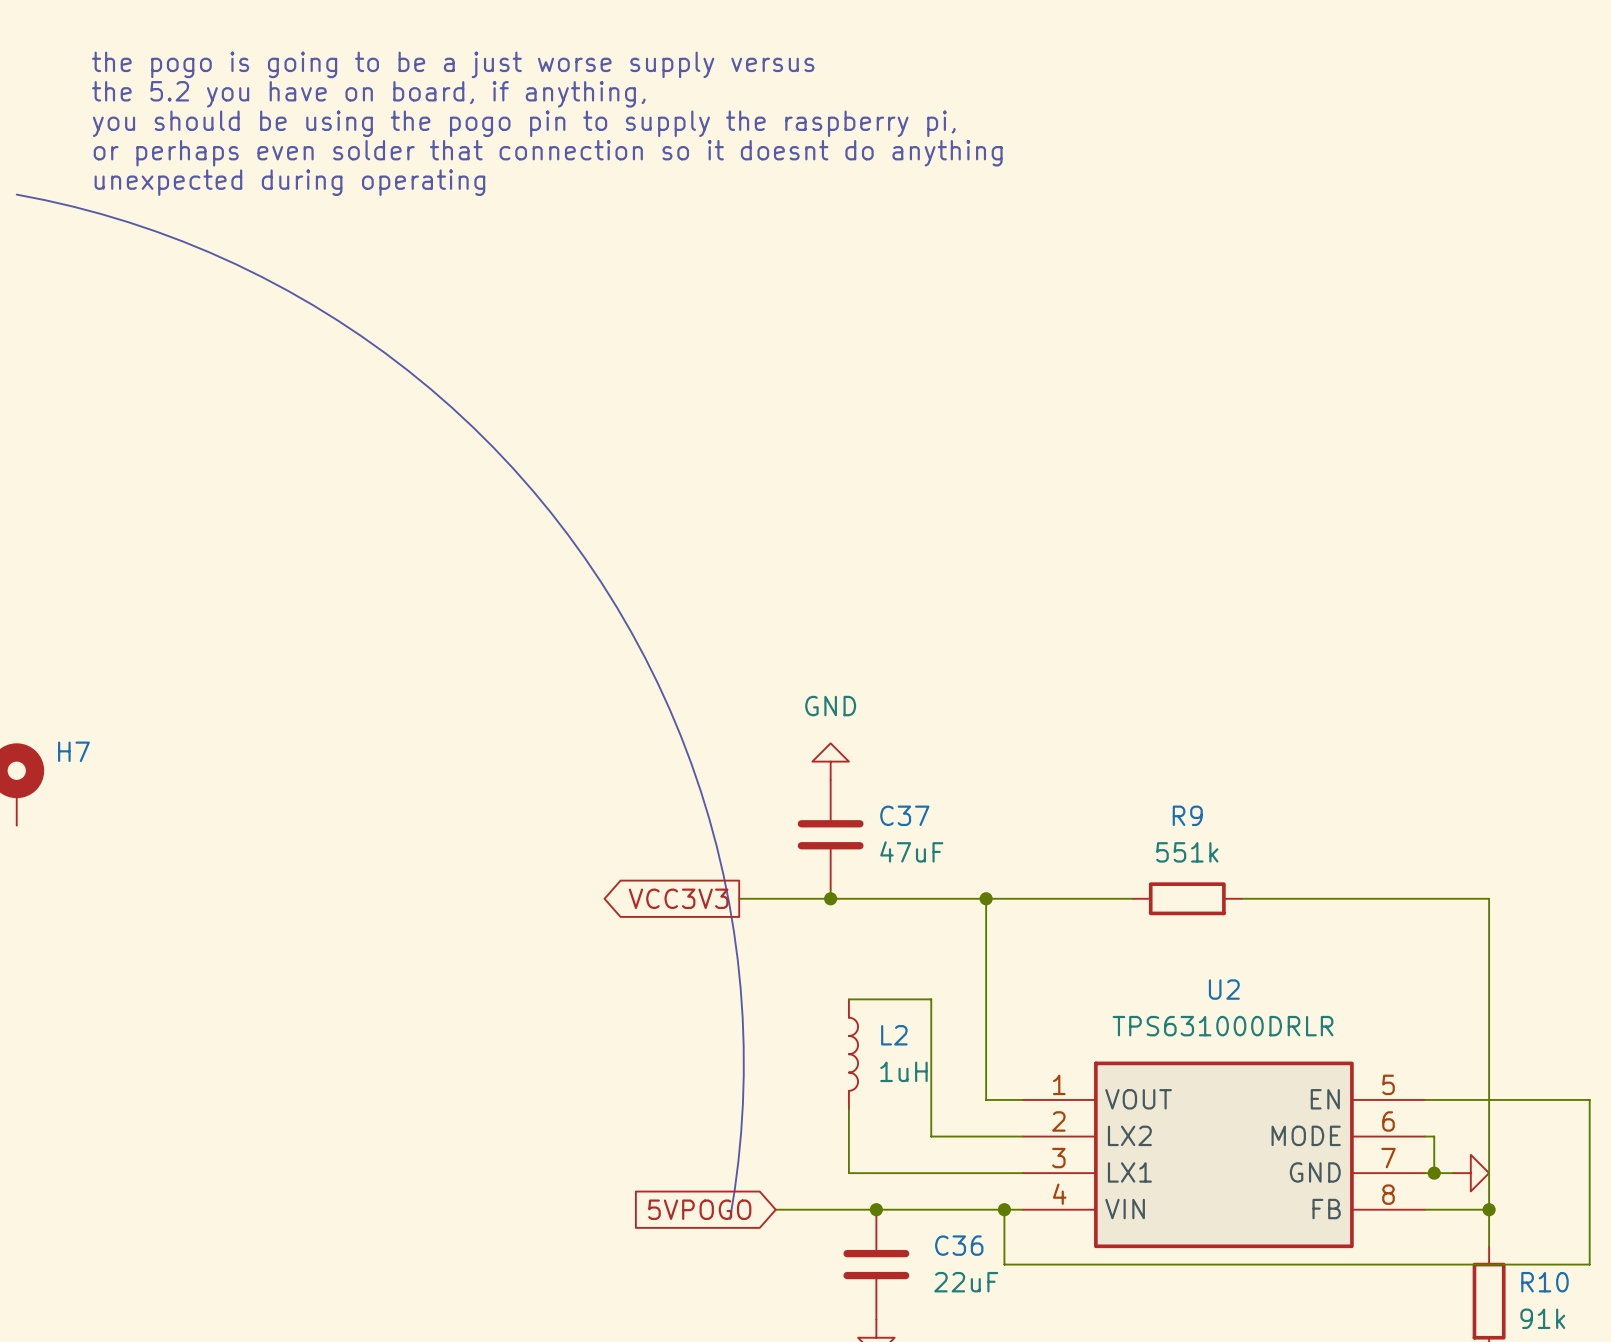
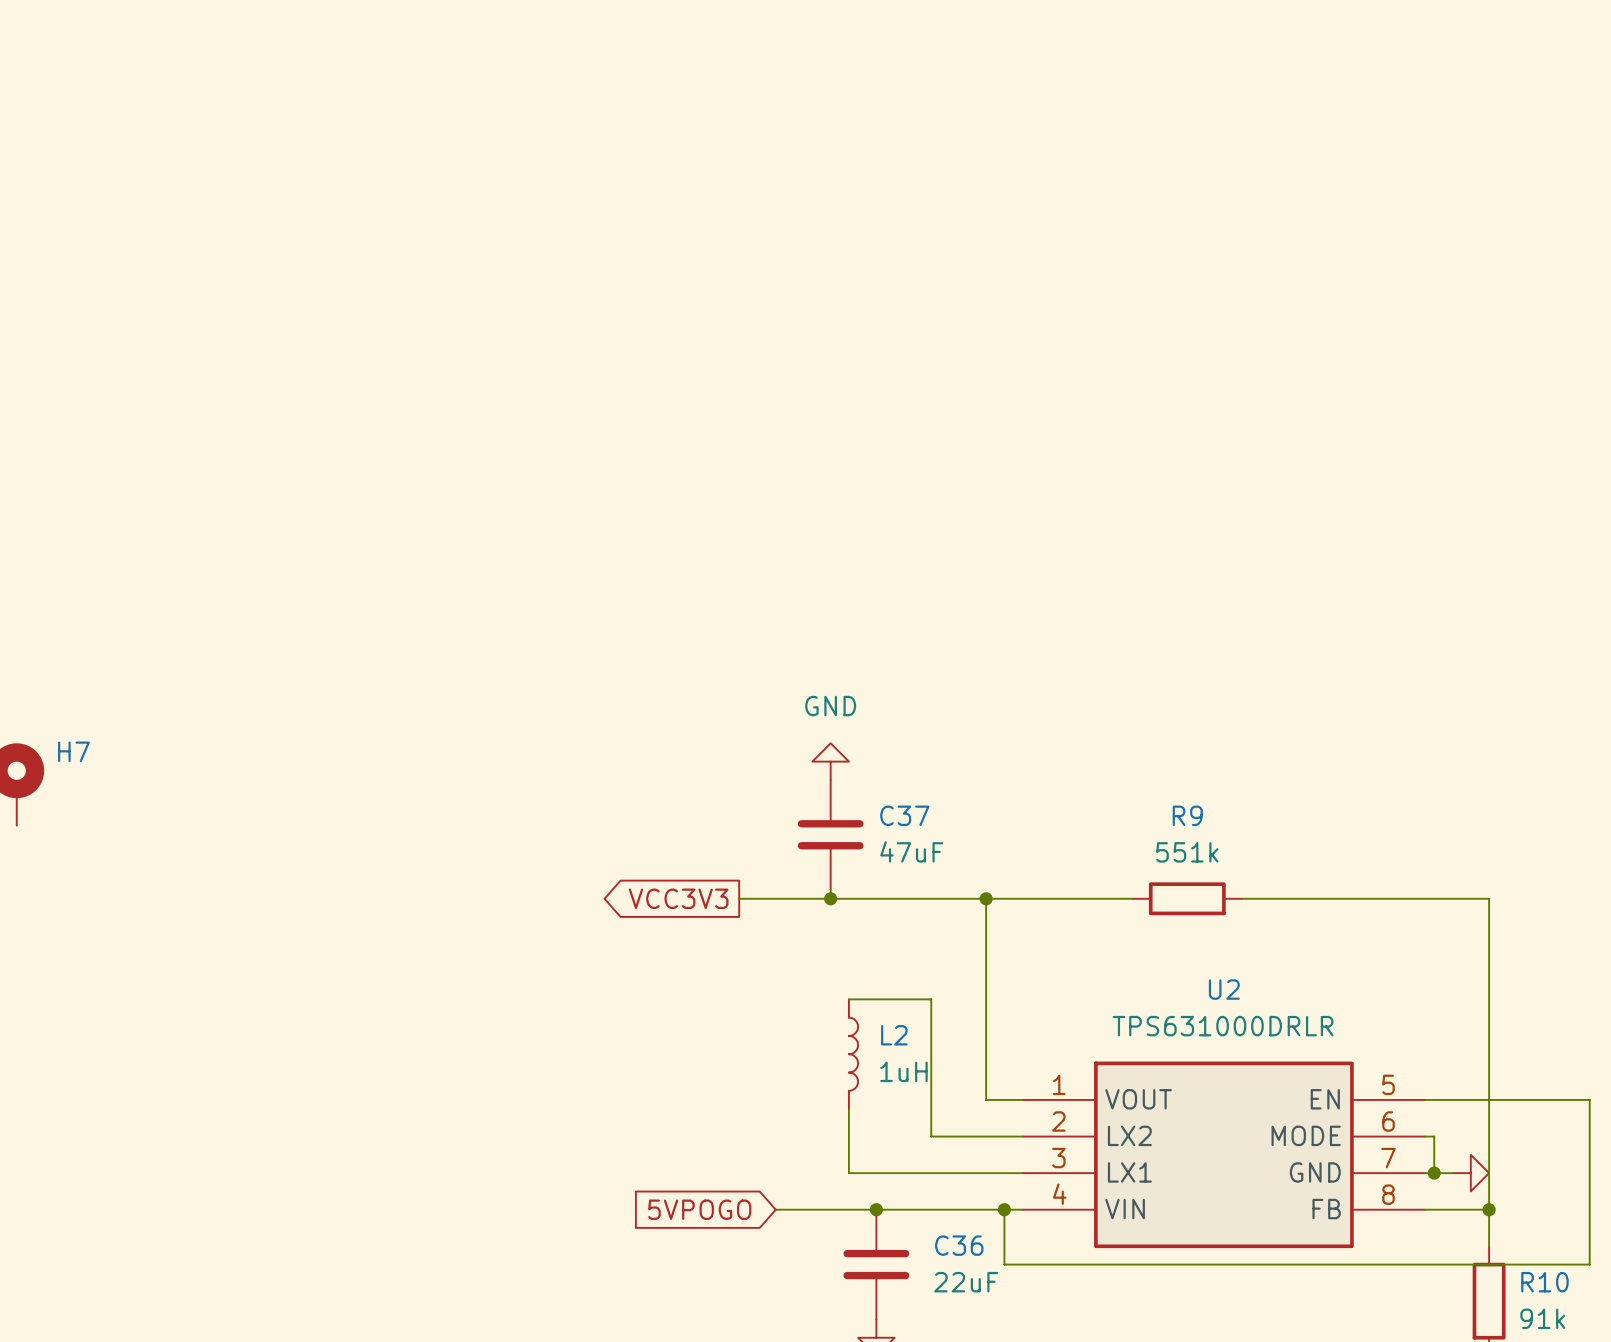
text: the pogo is going to be a just worse supply versus (453, 64) -> none
text: the 5.2 you have on board, if anything, (368, 94) -> none
text: you should be using the pogo pin to supply the raspberry pi, (524, 123) -> none
text: or perhaps even solder that connection so it doesnt do anything (548, 153) -> none
text: unexpected during operating (289, 182) -> none
line: (16, 194) (101, 214) (183, 241) (262, 277) (337, 320) (407, 370) (473, 427) (532, 490) (585, 559) (631, 632) (670, 709) (700, 790) (723, 874) (737, 959) (743, 1046) (741, 1132) (730, 1218) -> none

